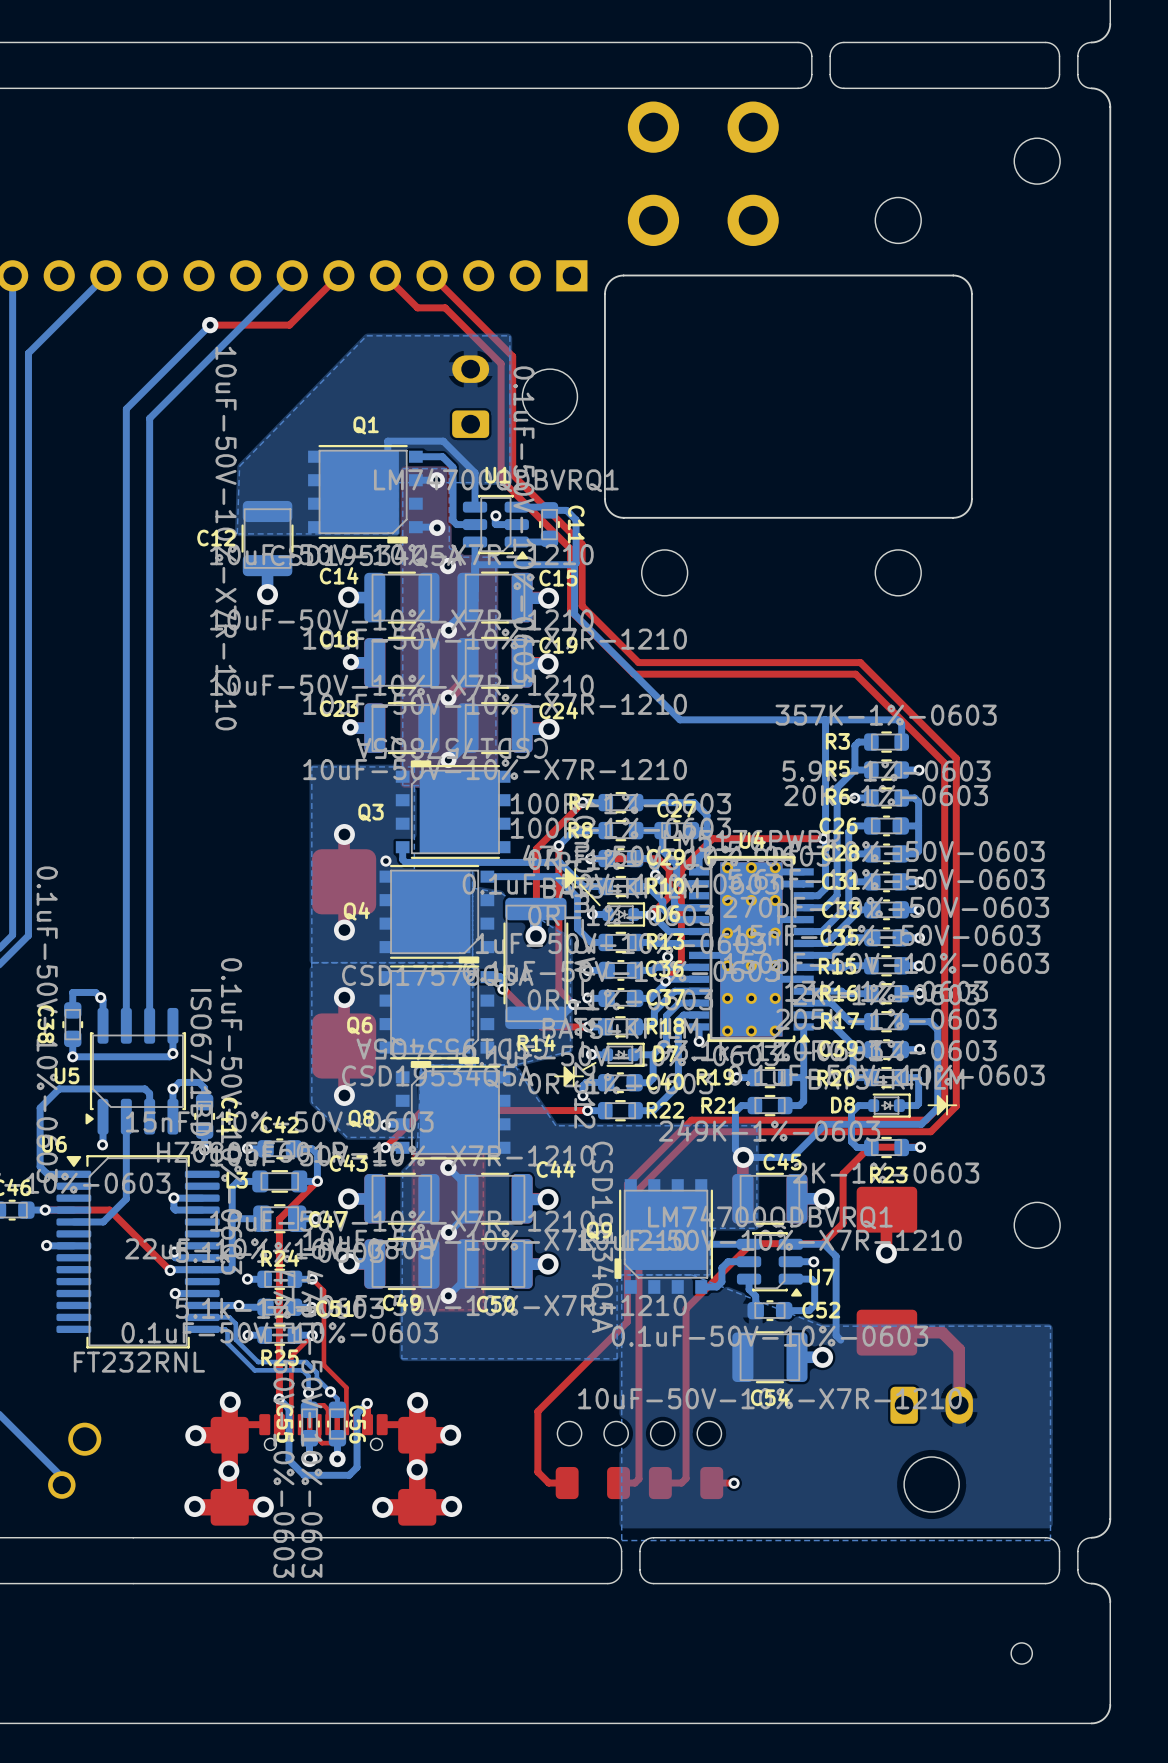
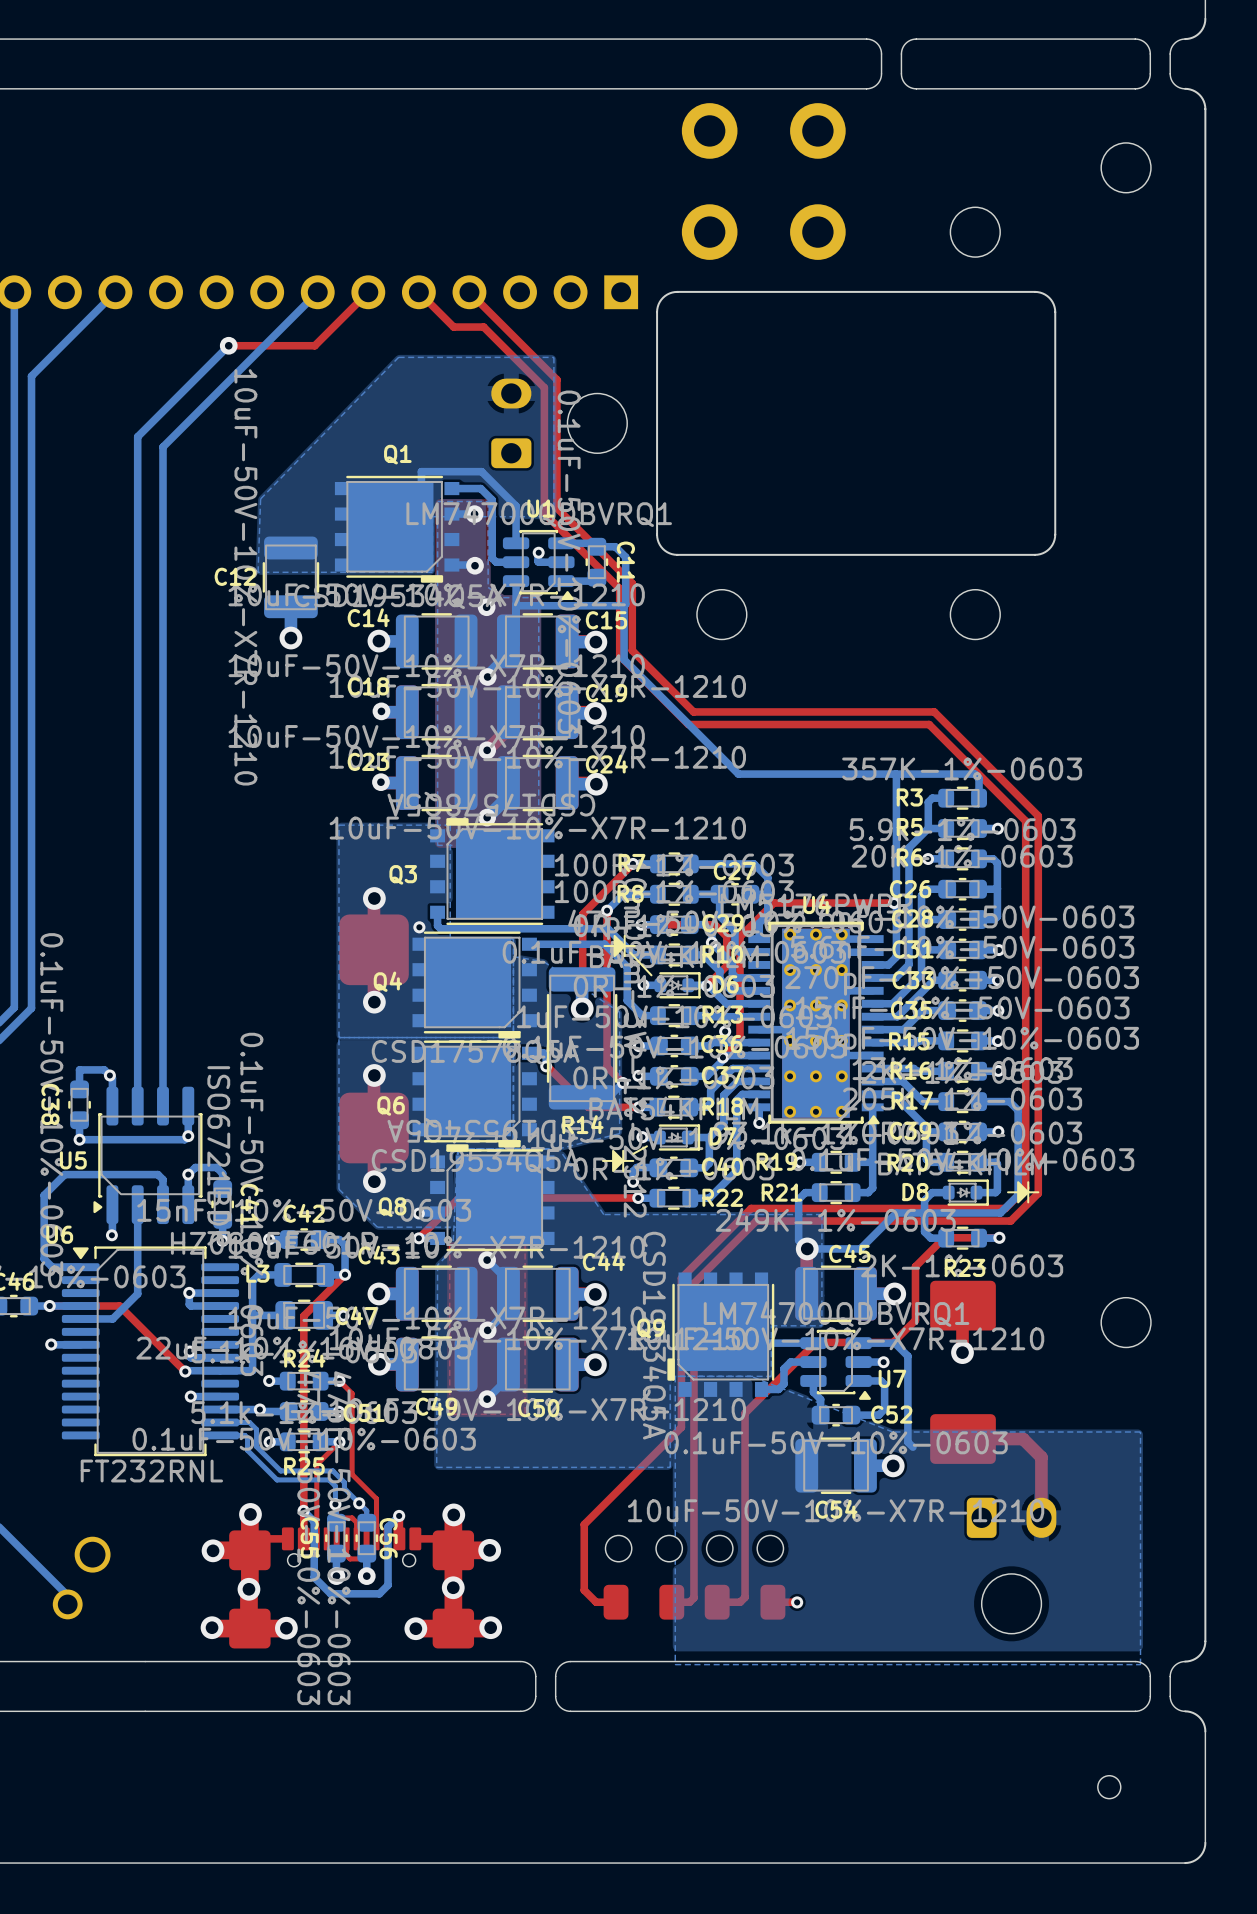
board edge: (525, 1537) (479, 1537) -> (520, 1711) (531, 1706) (535, 1696) (534, 1670) (529, 1664) (520, 1661)
board edge: (607, 1537) (617, 1541) (621, 1551) (620, 1575) (614, 1581) (607, 1583) -> (709, 1711) (660, 1711)
board edge: (653, 1537) (643, 1541) (639, 1551) (641, 1575) (646, 1581) (653, 1583) -> (709, 1661) (660, 1661)
board edge: (525, 1583) (479, 1583) -> (570, 1711) (560, 1706) (555, 1696) (556, 1670) (561, 1664) (570, 1661)

